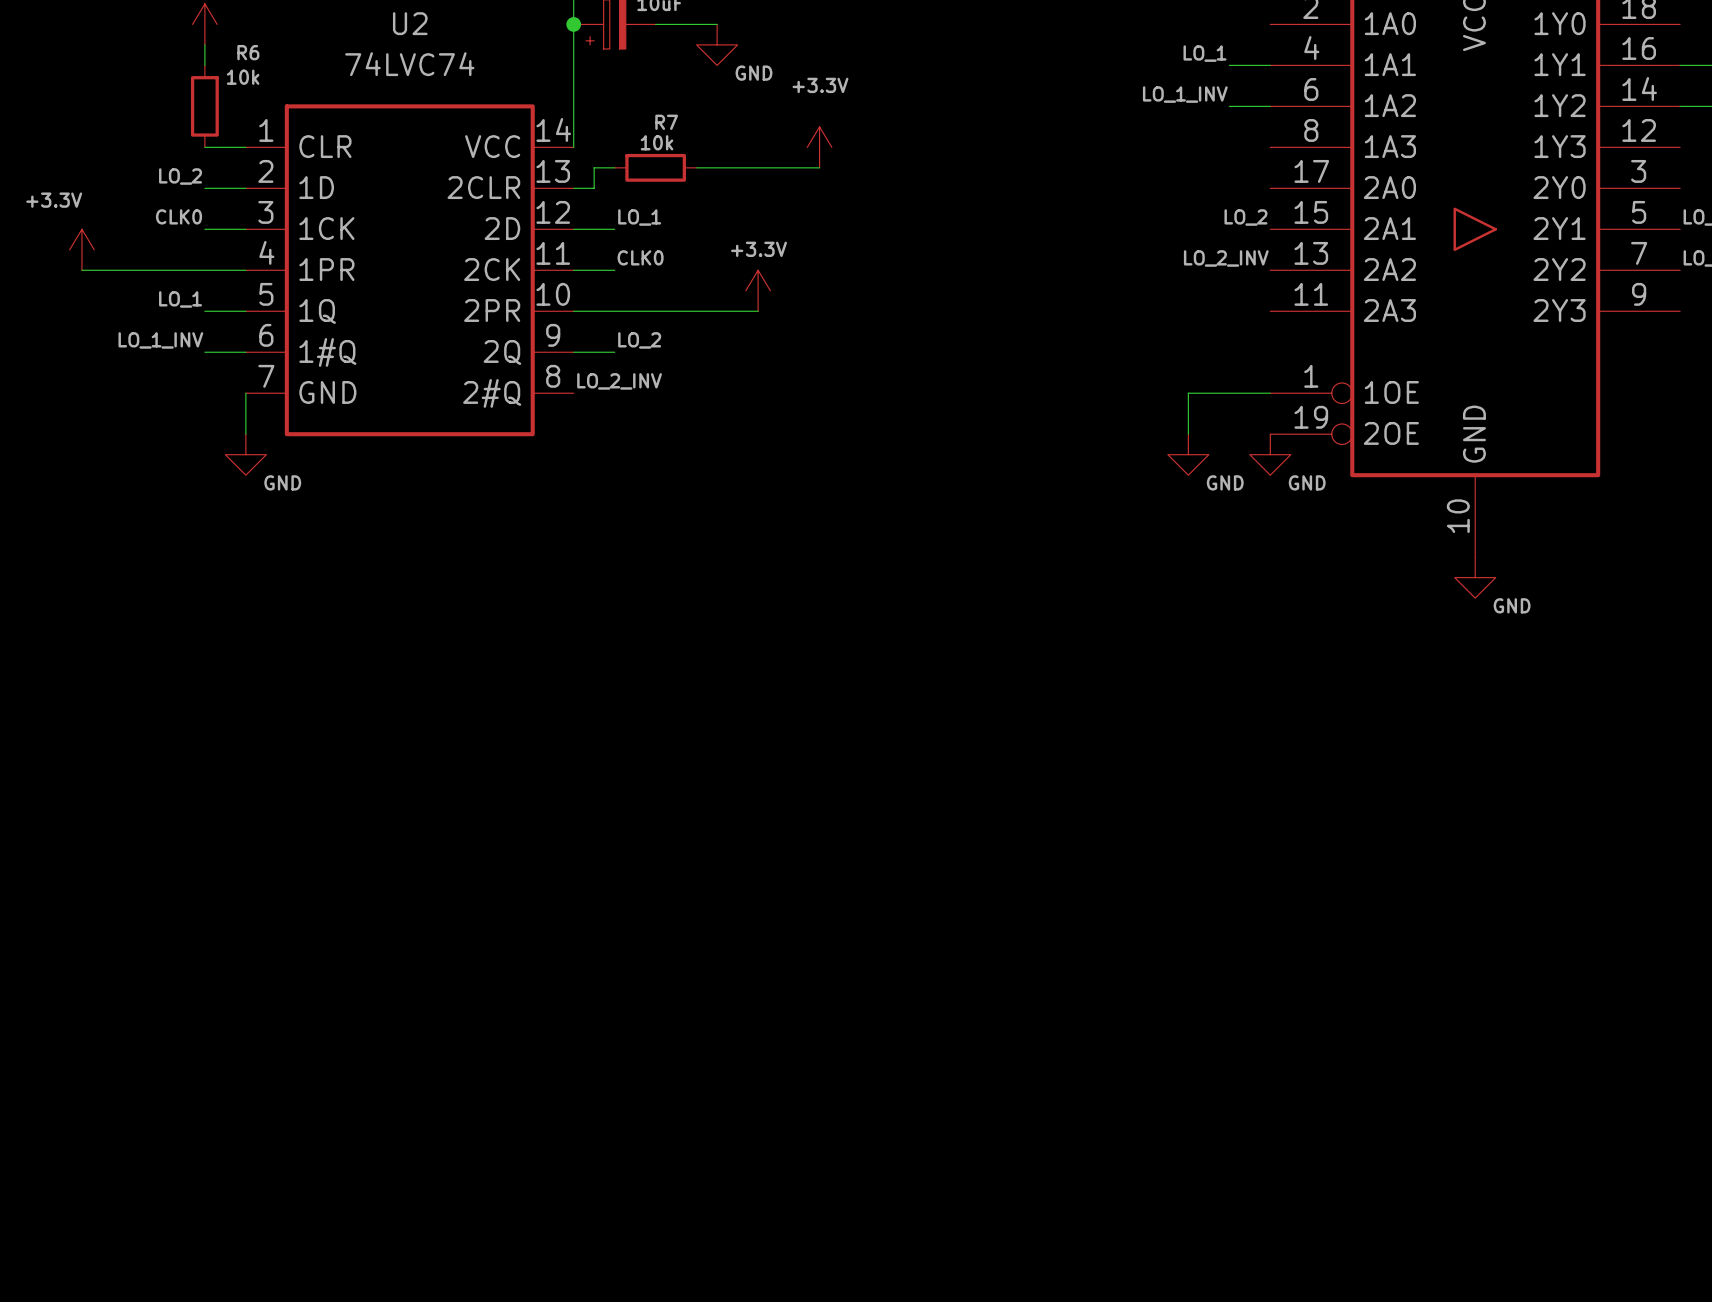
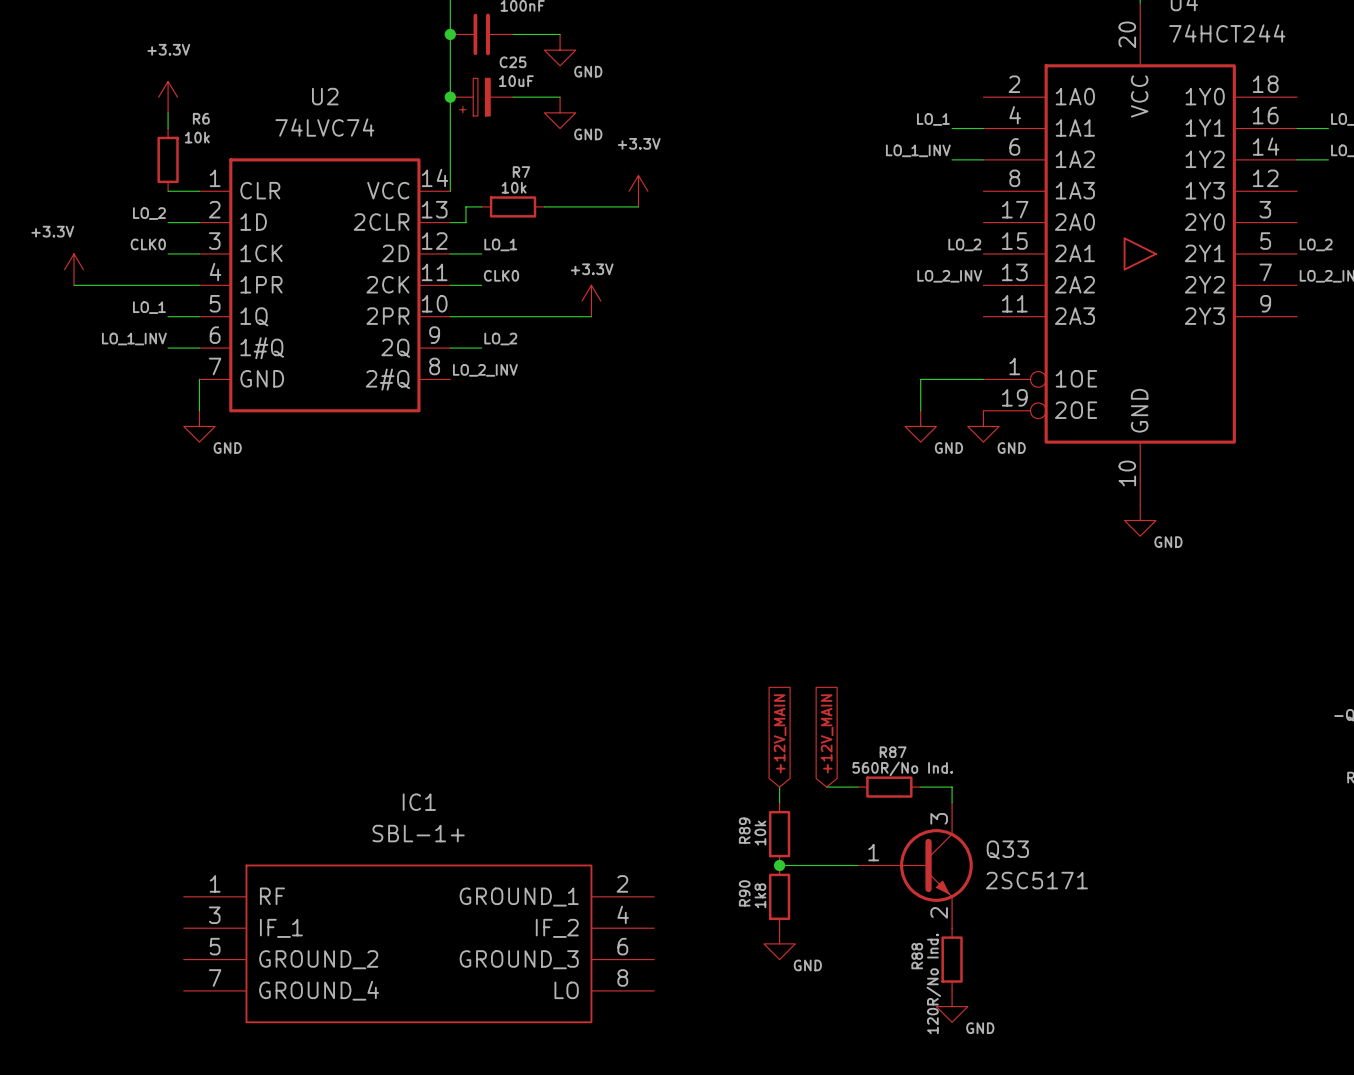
global label: none -> +12V_MAIN (780, 733)
global label: none -> +12V_MAIN (827, 733)
wire: none -> (779, 787) (779, 802)
wire: none -> (826, 787) (857, 787)
R87: none -> 560R/No Ind. (889, 787)
wire: none -> (920, 787) (952, 787) (952, 802)
R89: none -> 10k (779, 834)
wire: none -> (779, 865) (857, 865)
junction: none -> (779, 865)
Q33: none -> 2SC5171 (915, 865)
R90: none -> 1k8 (779, 896)
IC1: none -> SBL-1+ (418, 943)
power symbol: none -> GND (779, 943)
R88: none -> 120R/No Ind. (952, 959)
power symbol: none -> GND (952, 1006)

